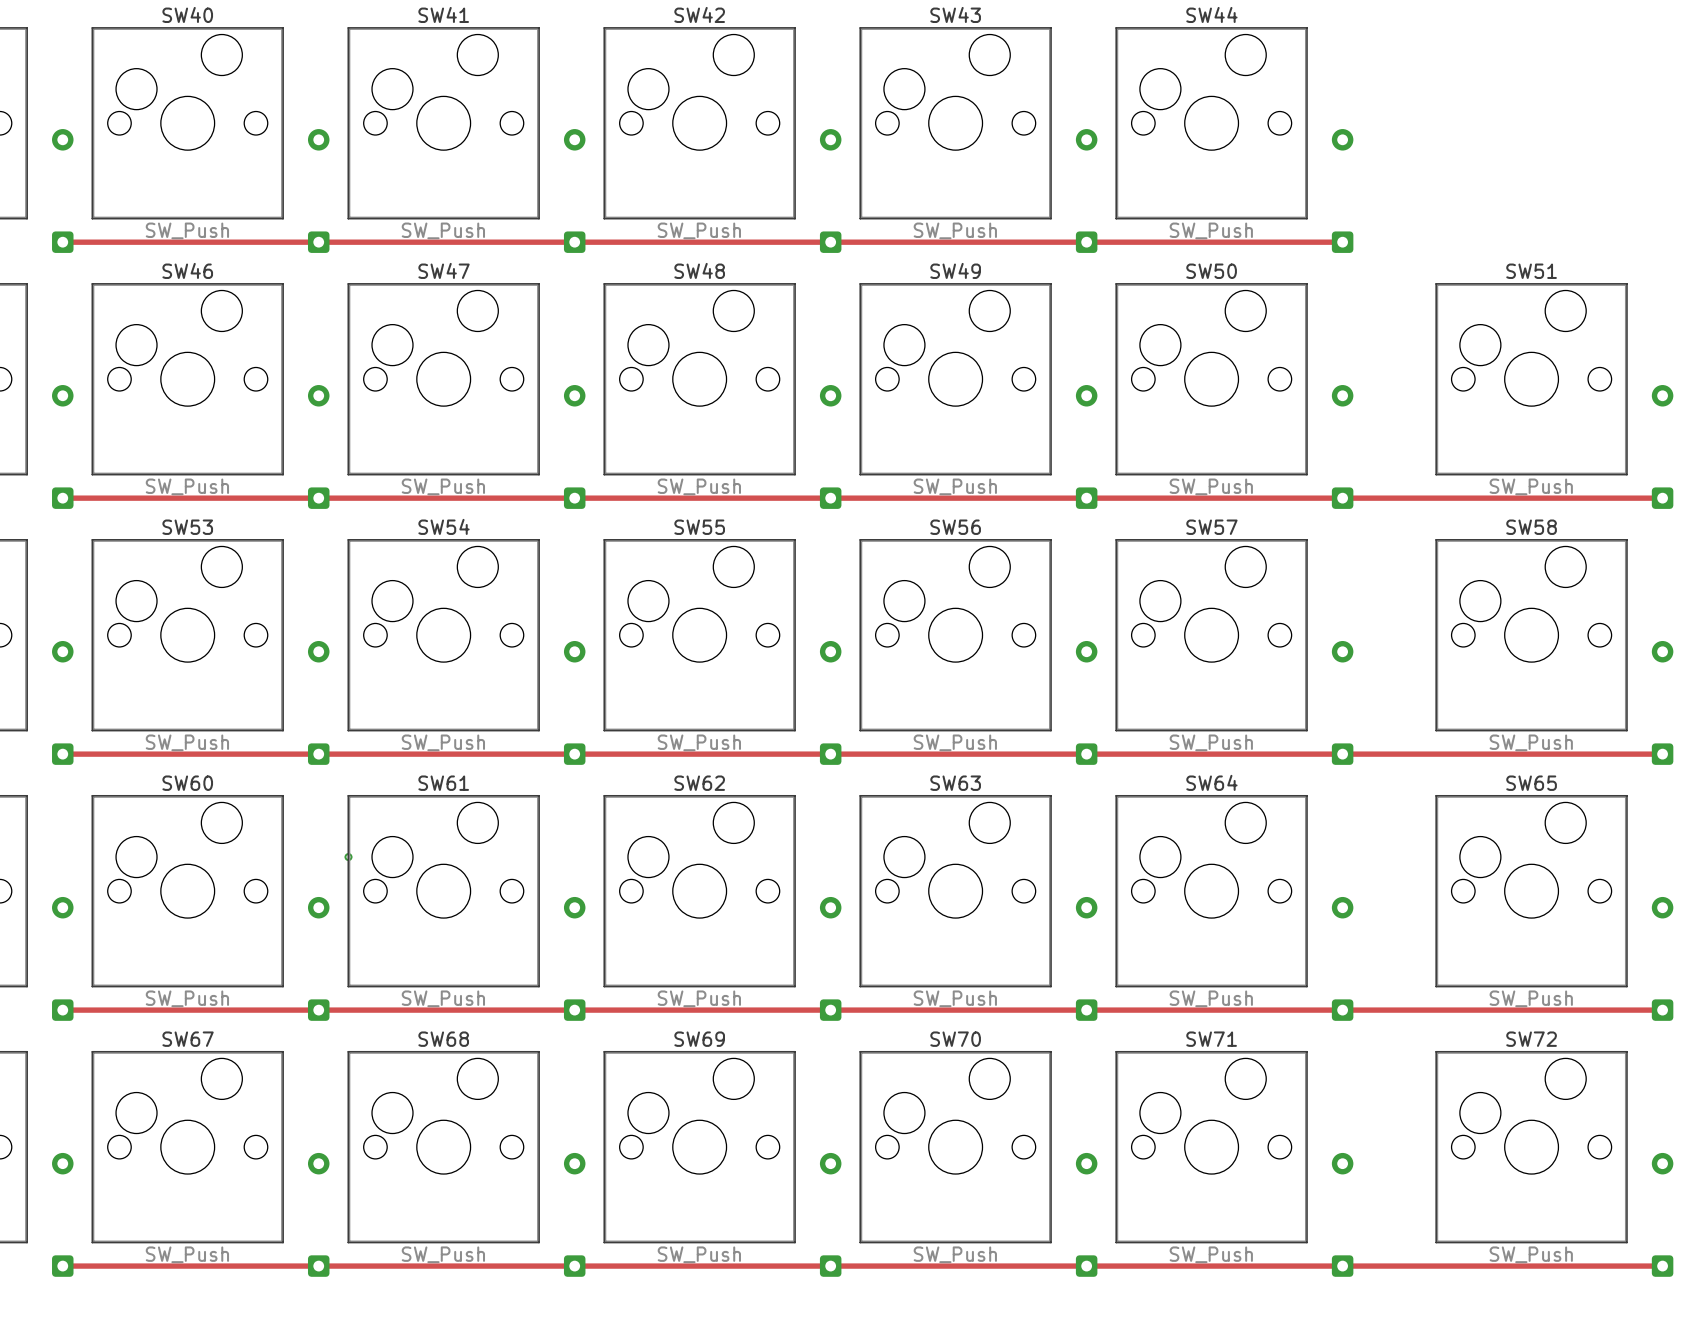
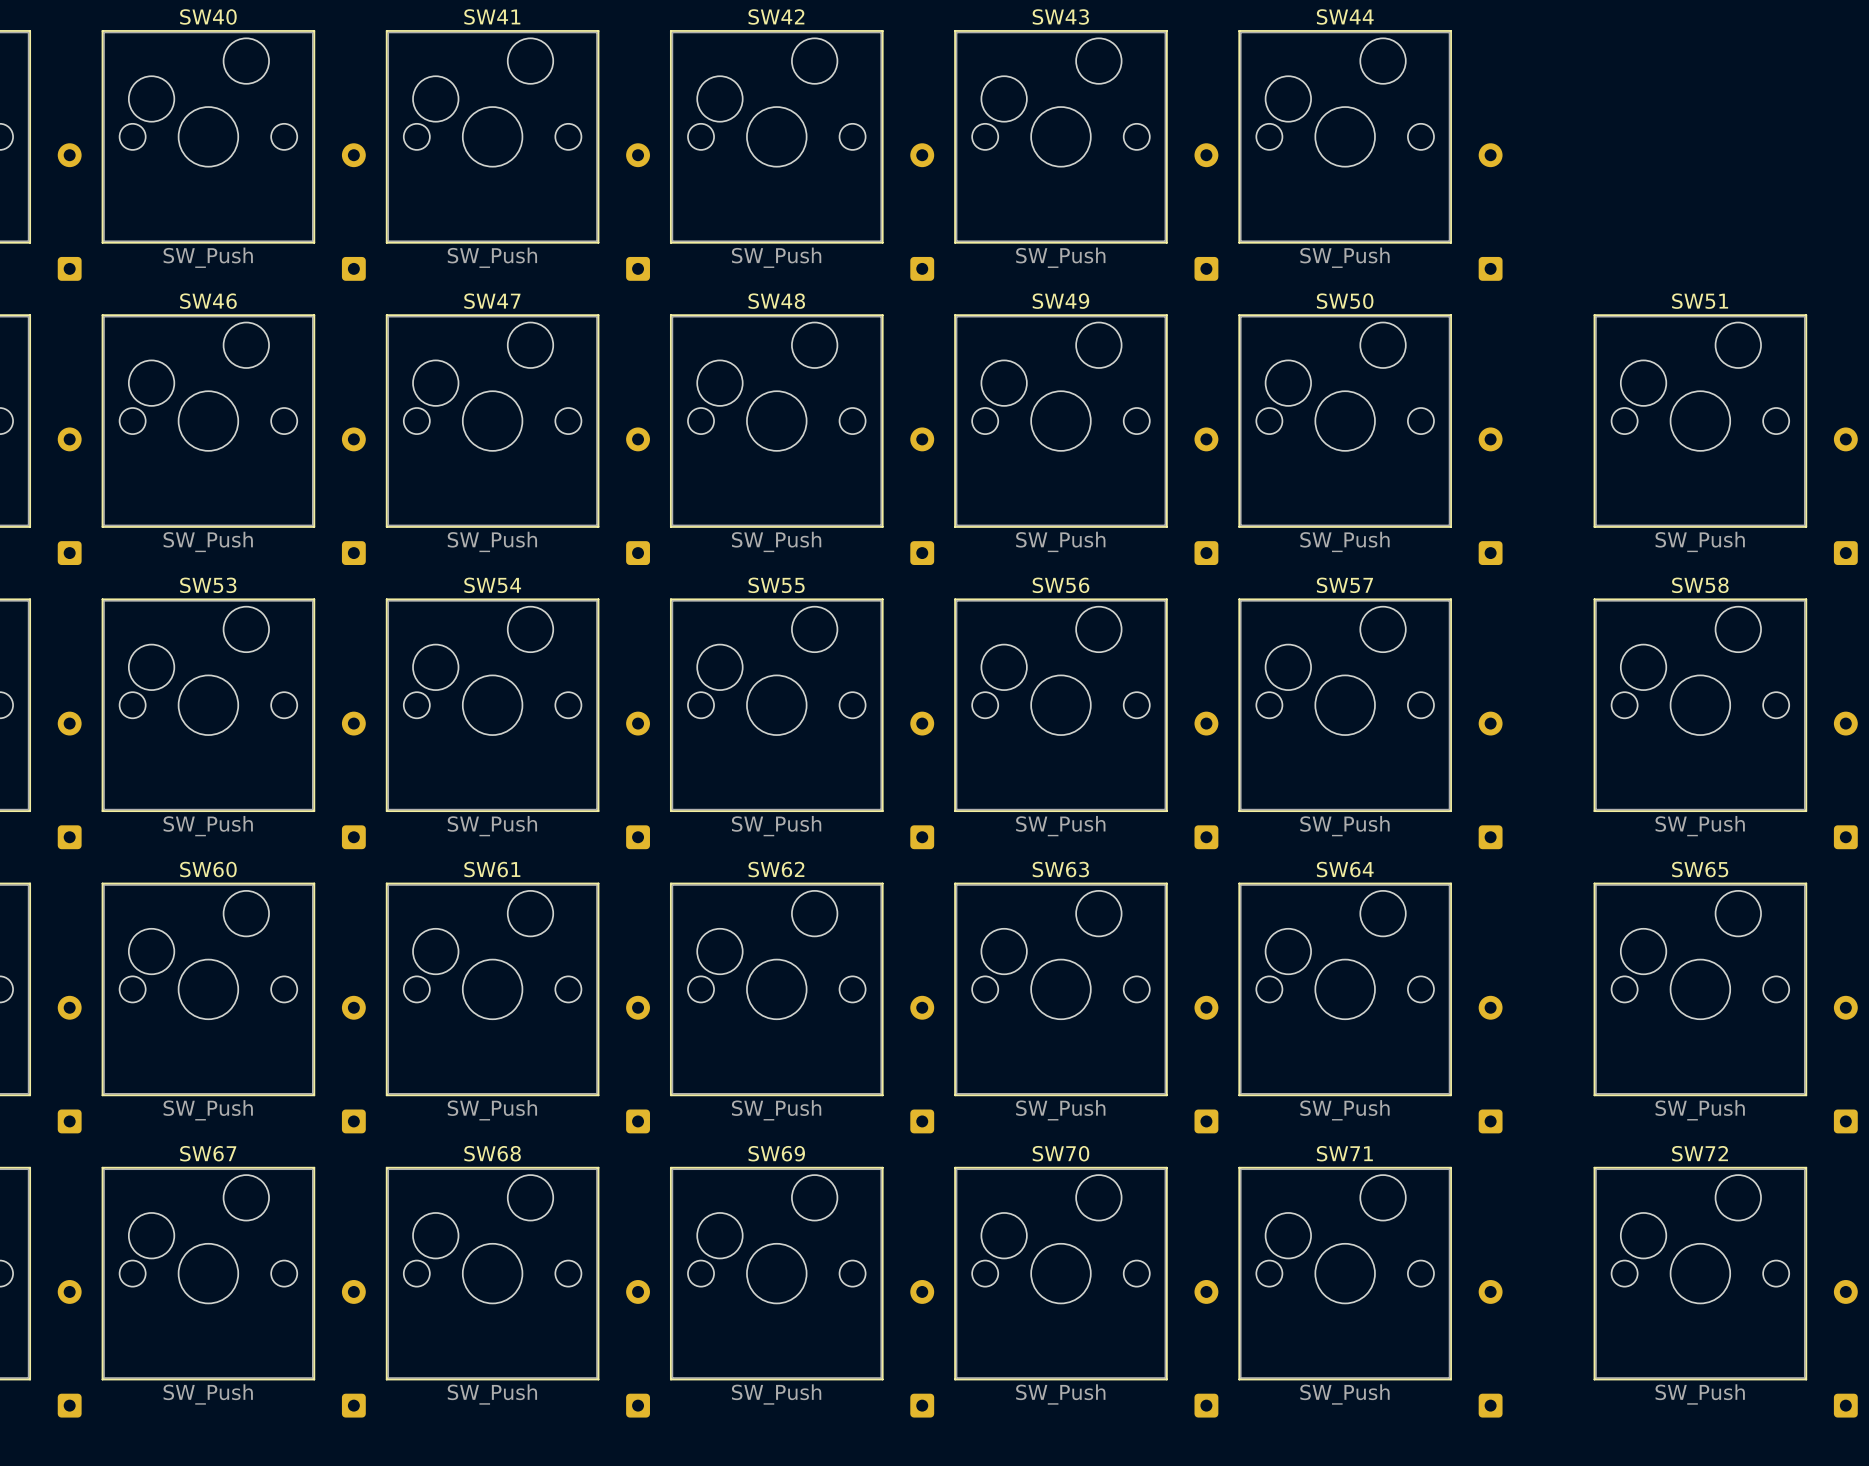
track: (62, 242) (1342, 242) -> none
track: (62, 498) (1662, 498) -> none
track: (62, 754) (1662, 754) -> none
via: (348, 857) -> none
track: (62, 1010) (1662, 1010) -> none
track: (62, 1266) (1662, 1266) -> none

